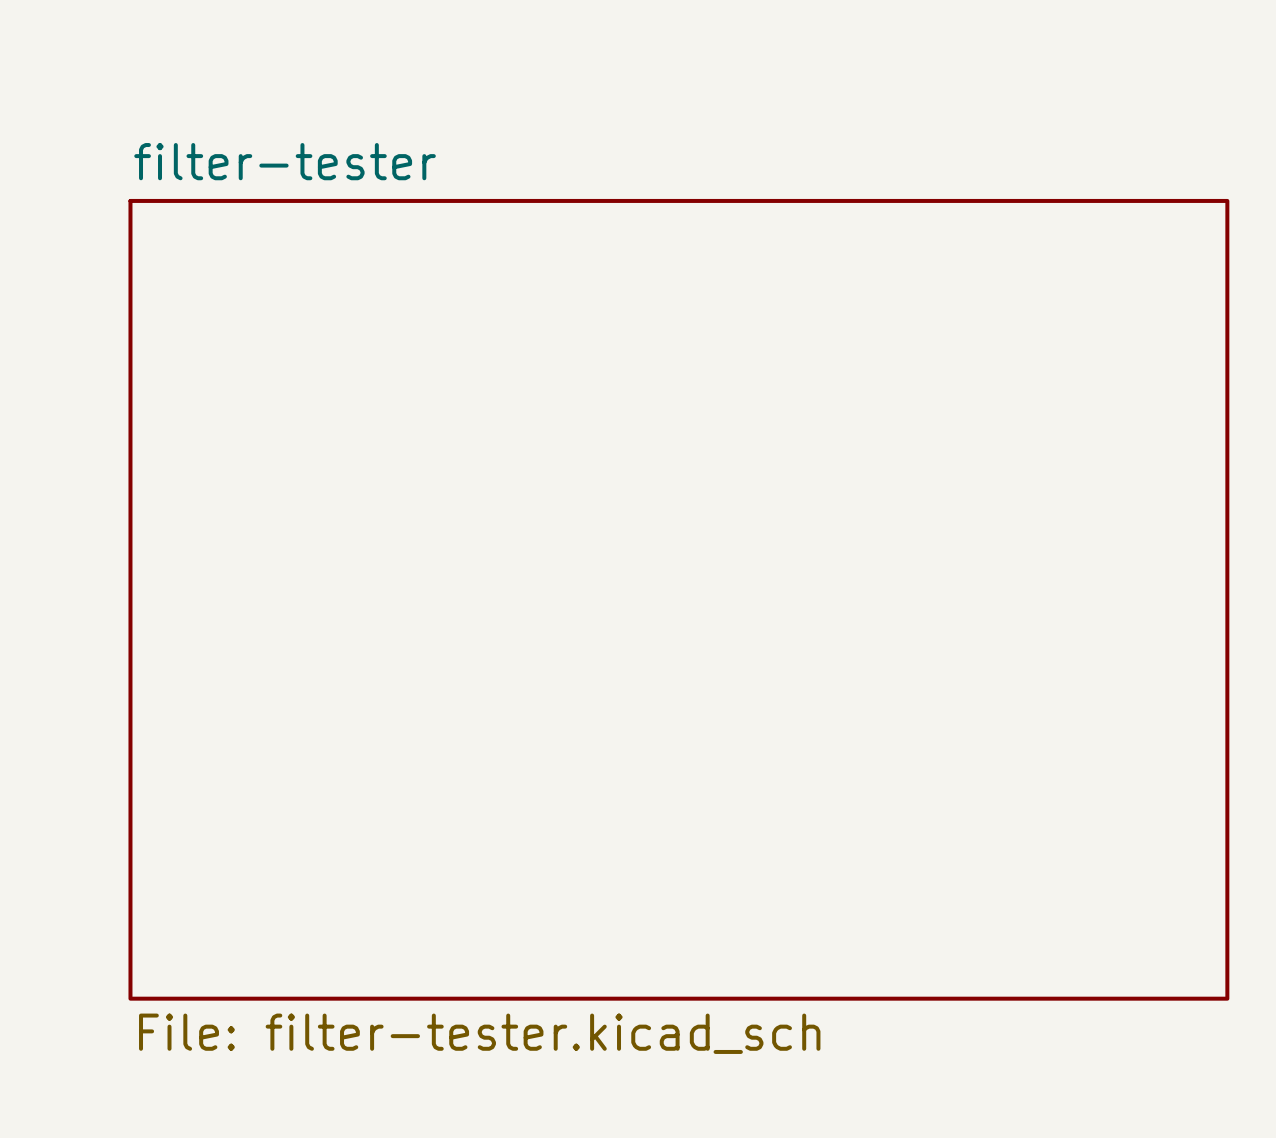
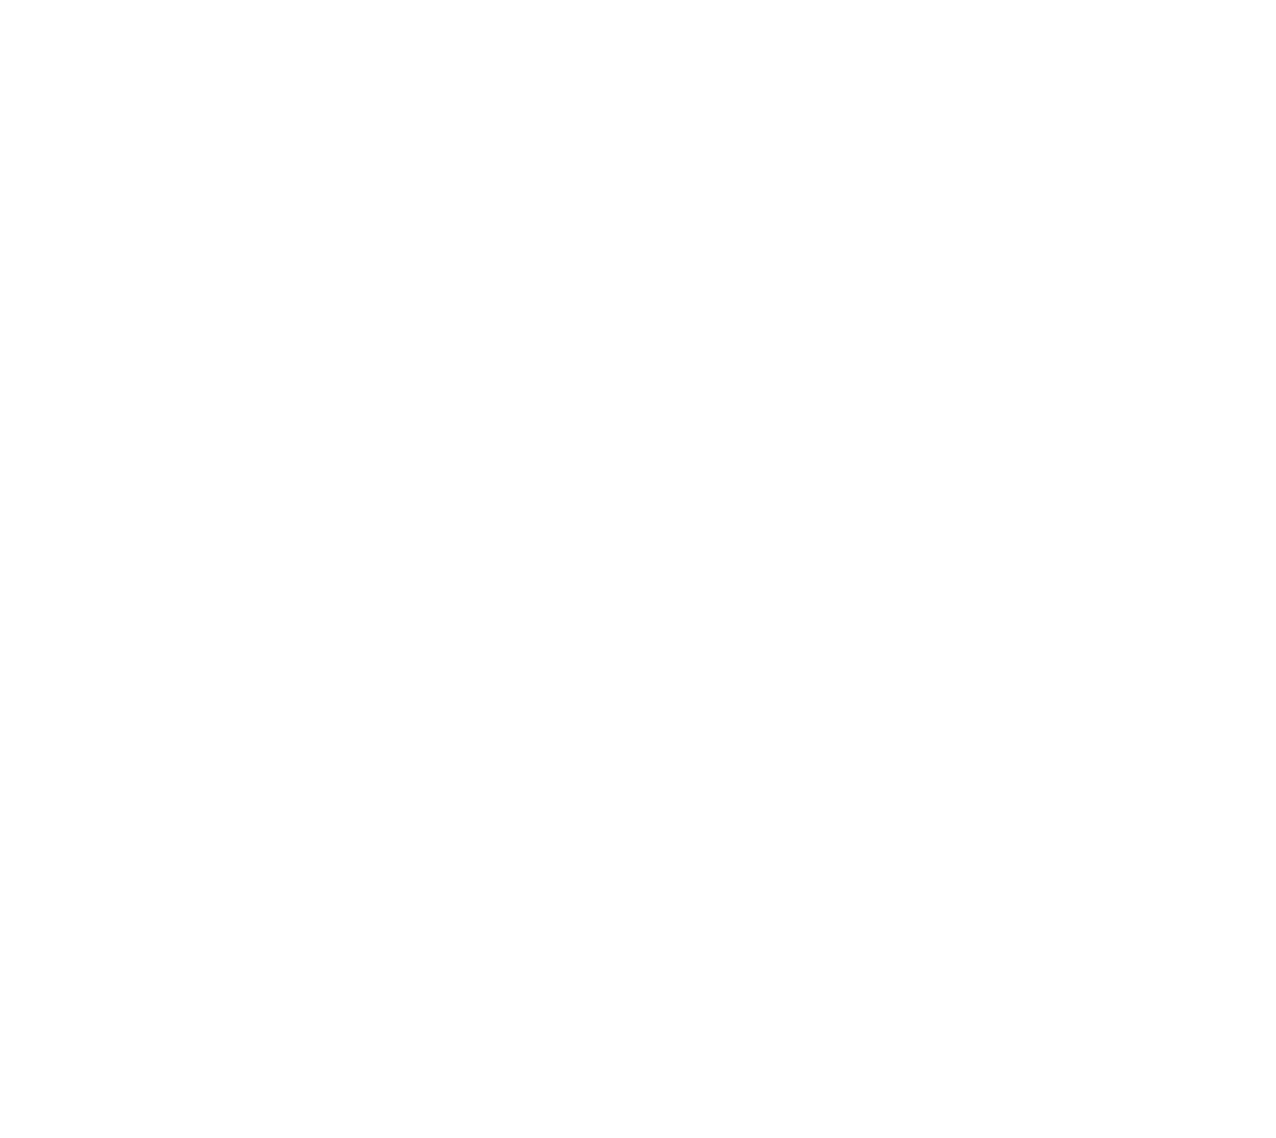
sheet filter-tester: File: filter-tester.kicad_sch (678, 599) -> none

